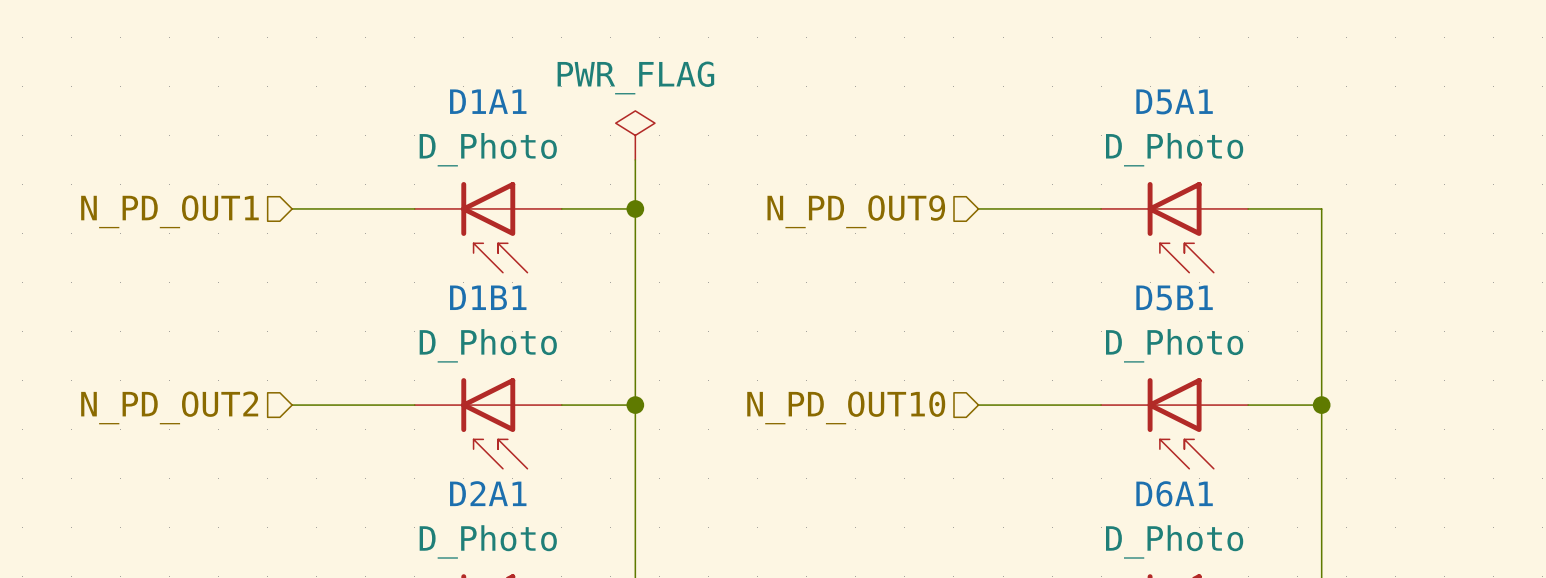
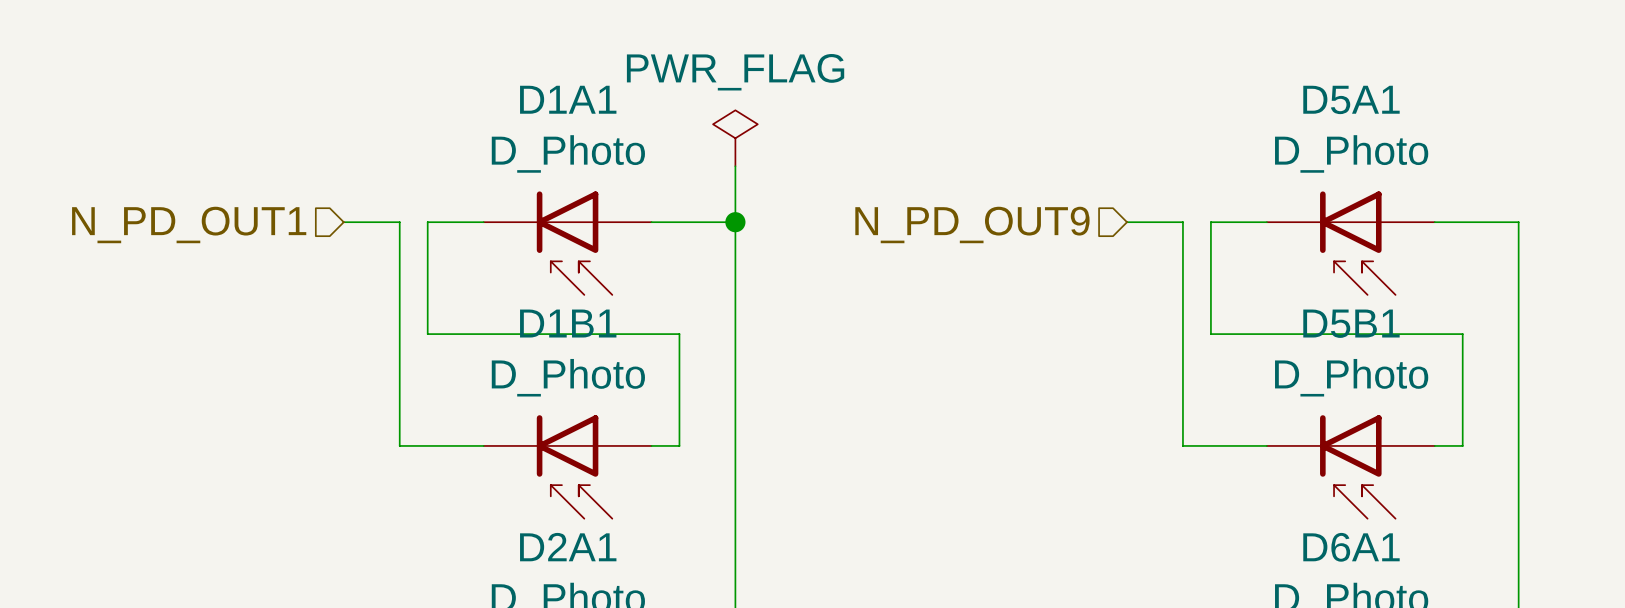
wire: (341, 208) (365, 208) -> (399, 222) (399, 445)
wire: (1027, 208) (1052, 208) -> (1182, 222) (1182, 445)
wire: (292, 405) (341, 405) -> none
wire: (586, 405) (635, 405) -> (679, 445) (679, 334) (427, 334) (427, 222)
junction: (635, 405) -> none
wire: (978, 405) (1027, 405) -> none
wire: (1272, 405) (1321, 405) -> (1462, 445) (1462, 334) (1210, 334) (1210, 222)
junction: (1321, 405) -> none
hierarchical label: N_PD_OUT2 (169, 407) -> none
hierarchical label: N_PD_OUT10 (846, 407) -> none

